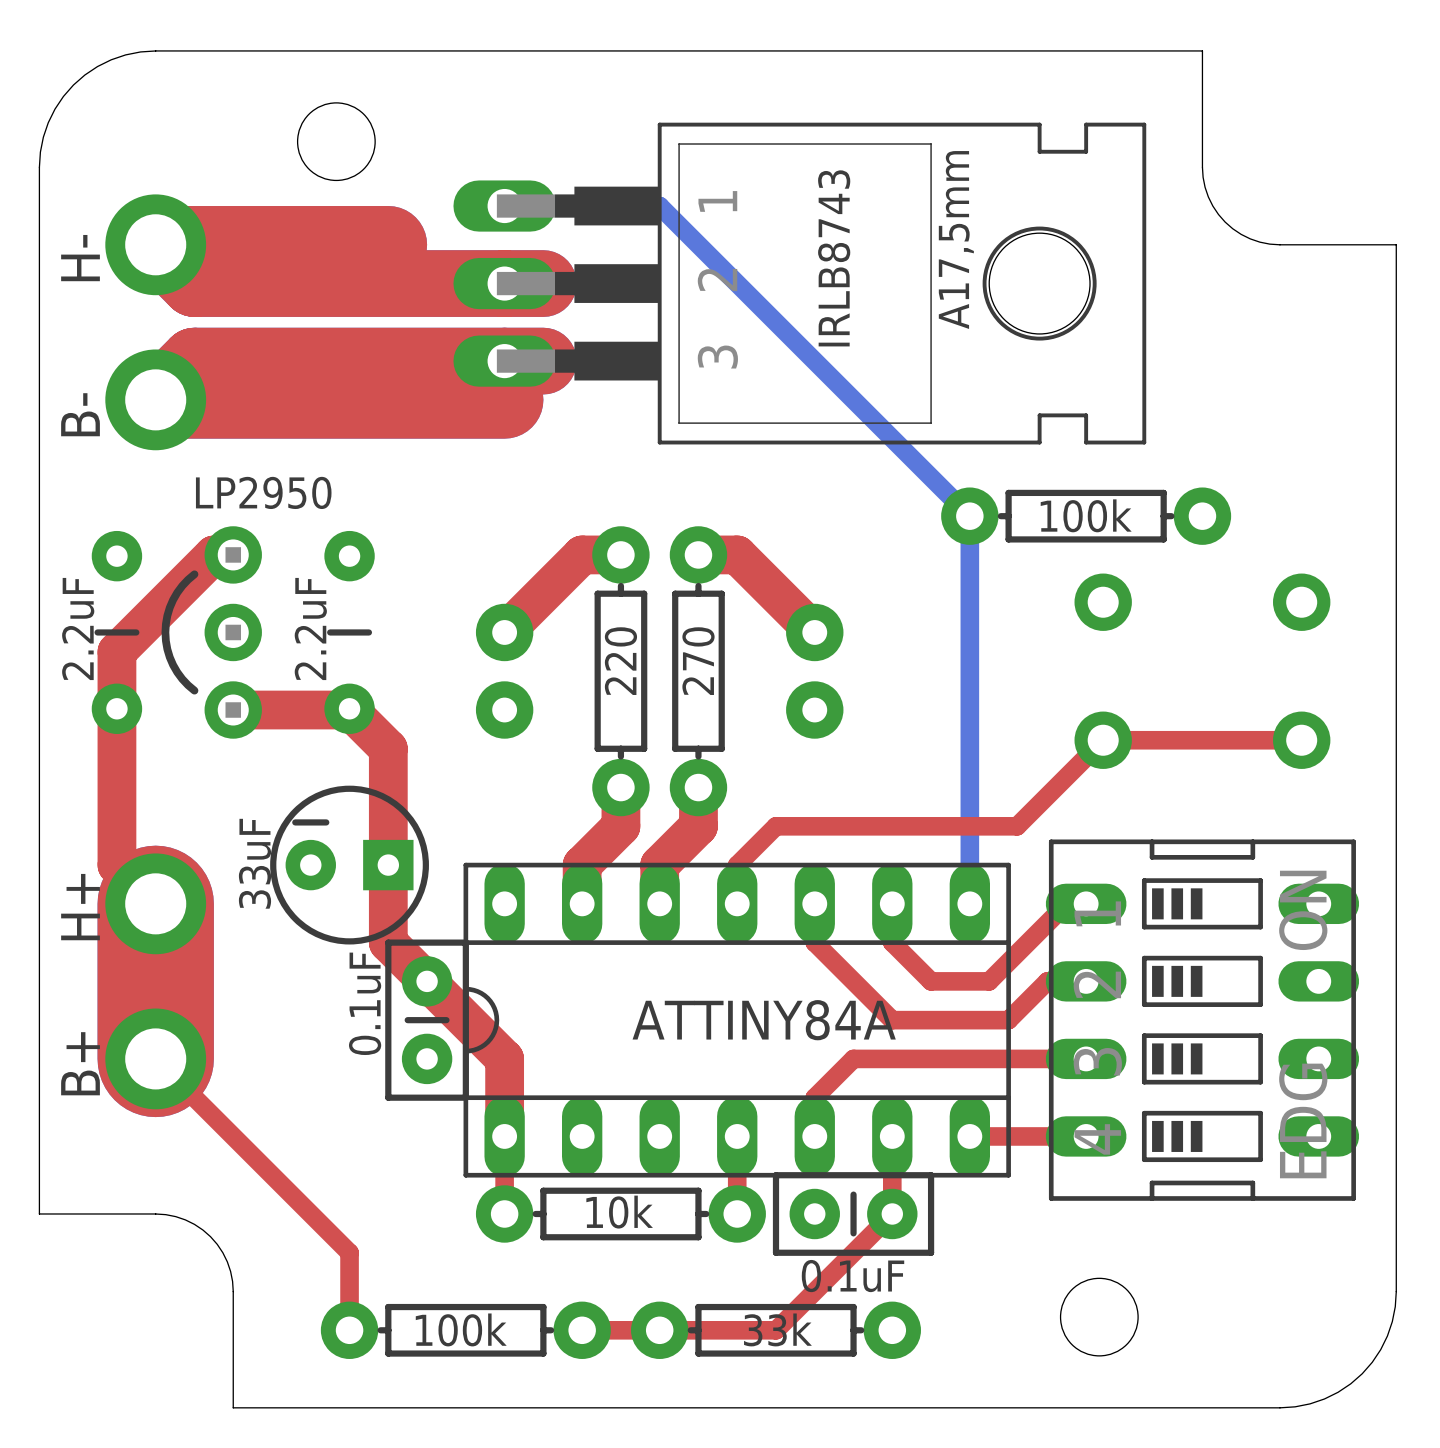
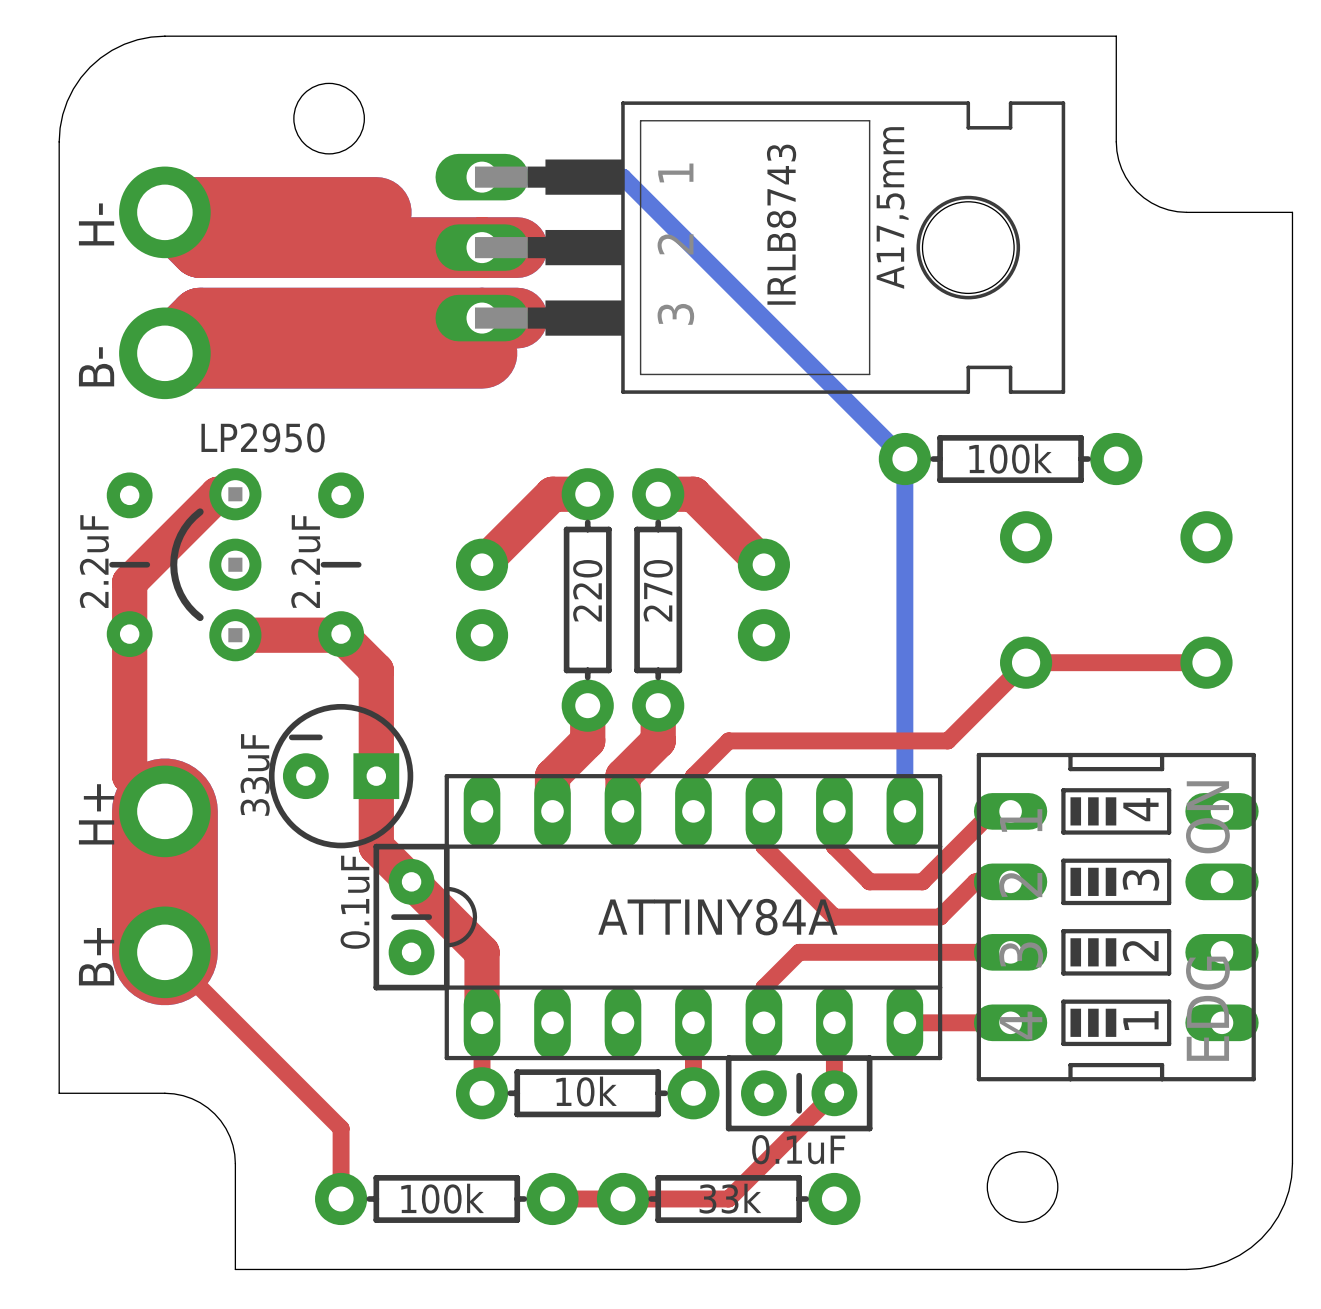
text: none -> 4 (1140, 809)
text: none -> 3 (1140, 880)
text: none -> 2 (1140, 951)
text: none -> 1 (1140, 1020)

